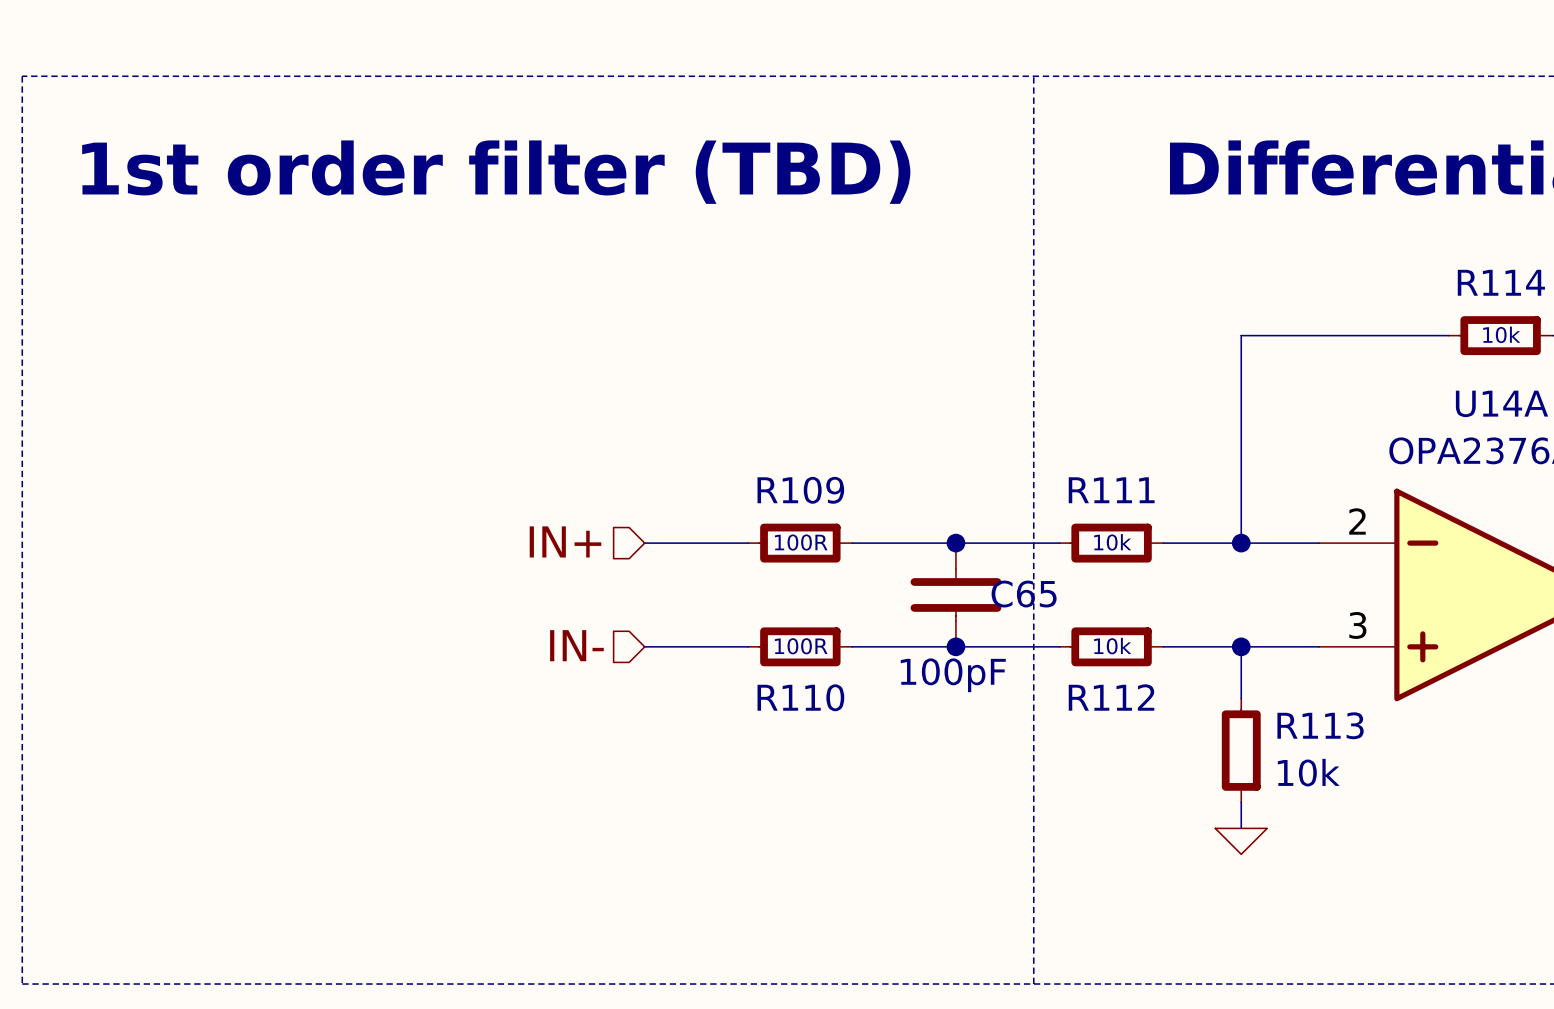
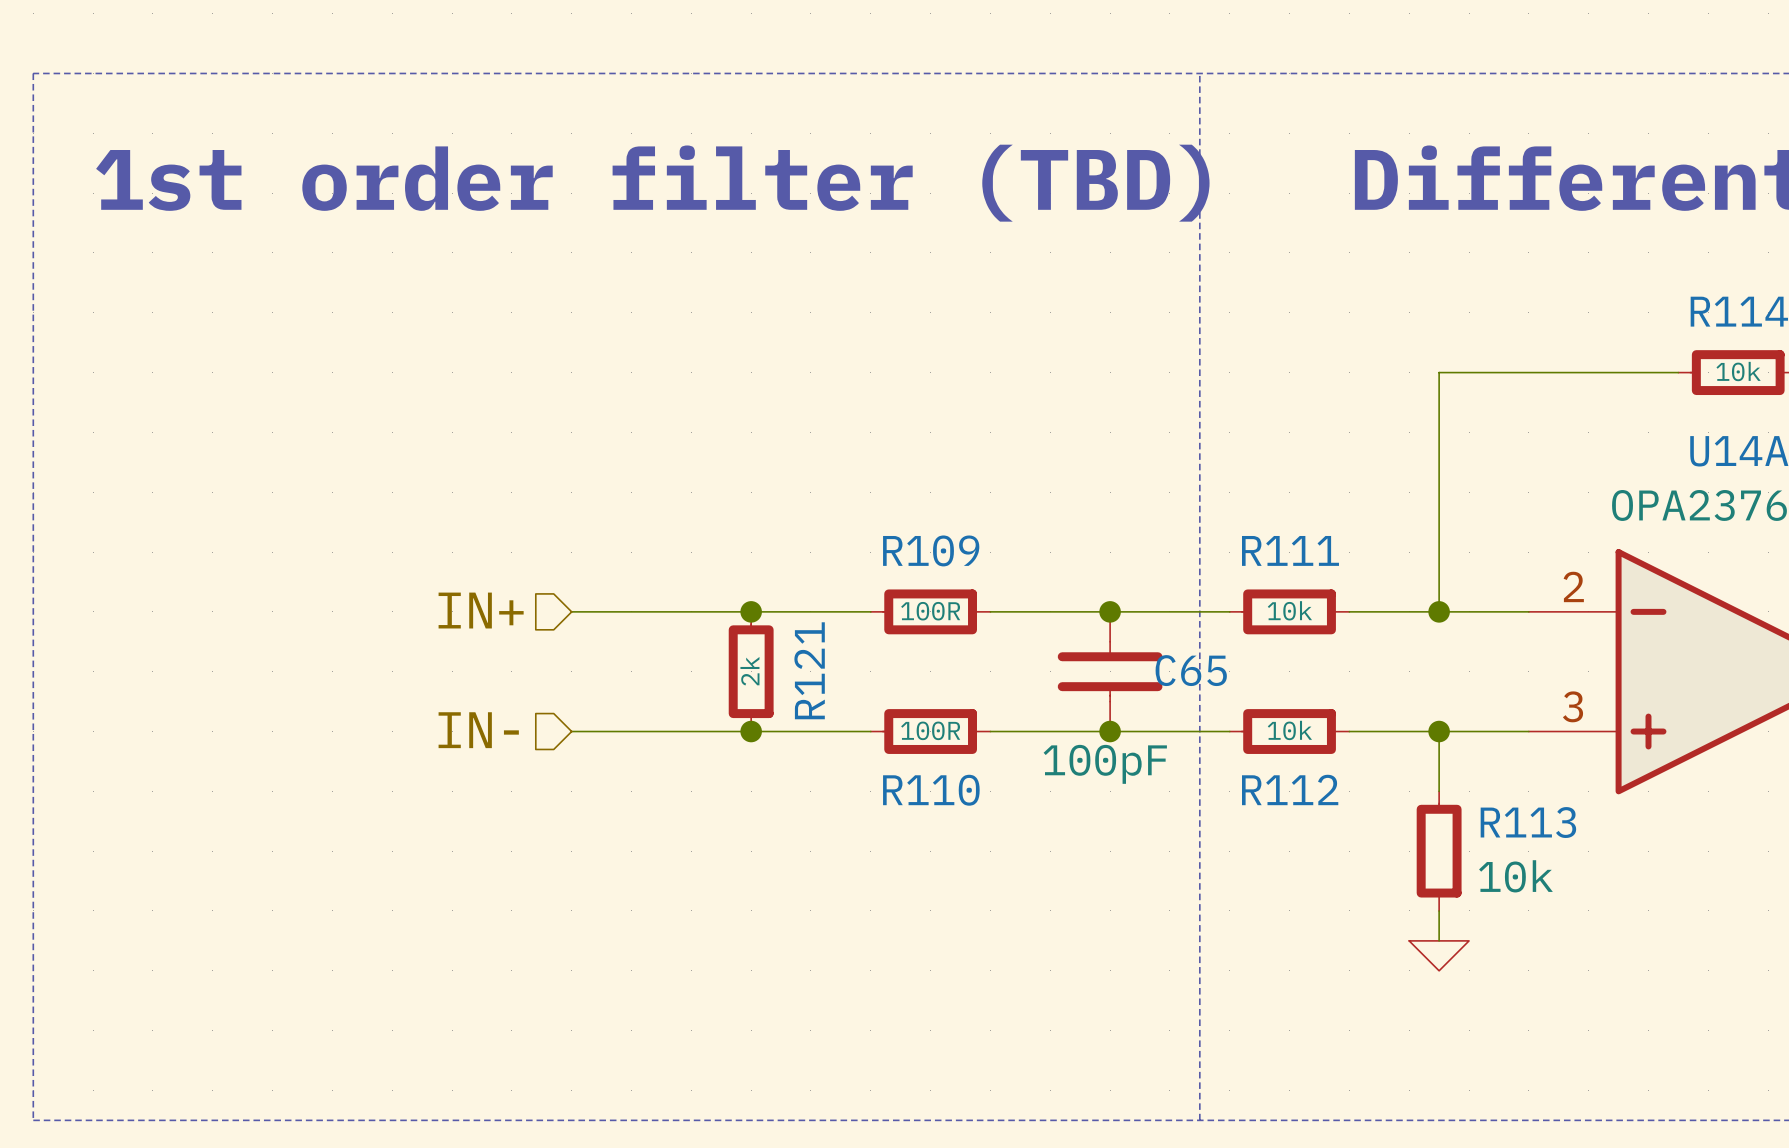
hierarchical label position: IN+ (565, 541) -> IN+ (481, 610)
wire: none -> (571, 611) (751, 611)
junction: none -> (751, 611)
R121: none -> 2k (751, 671)
hierarchical label position: IN- (576, 645) -> IN- (478, 730)
wire: none -> (571, 731) (751, 731)
junction: none -> (751, 731)

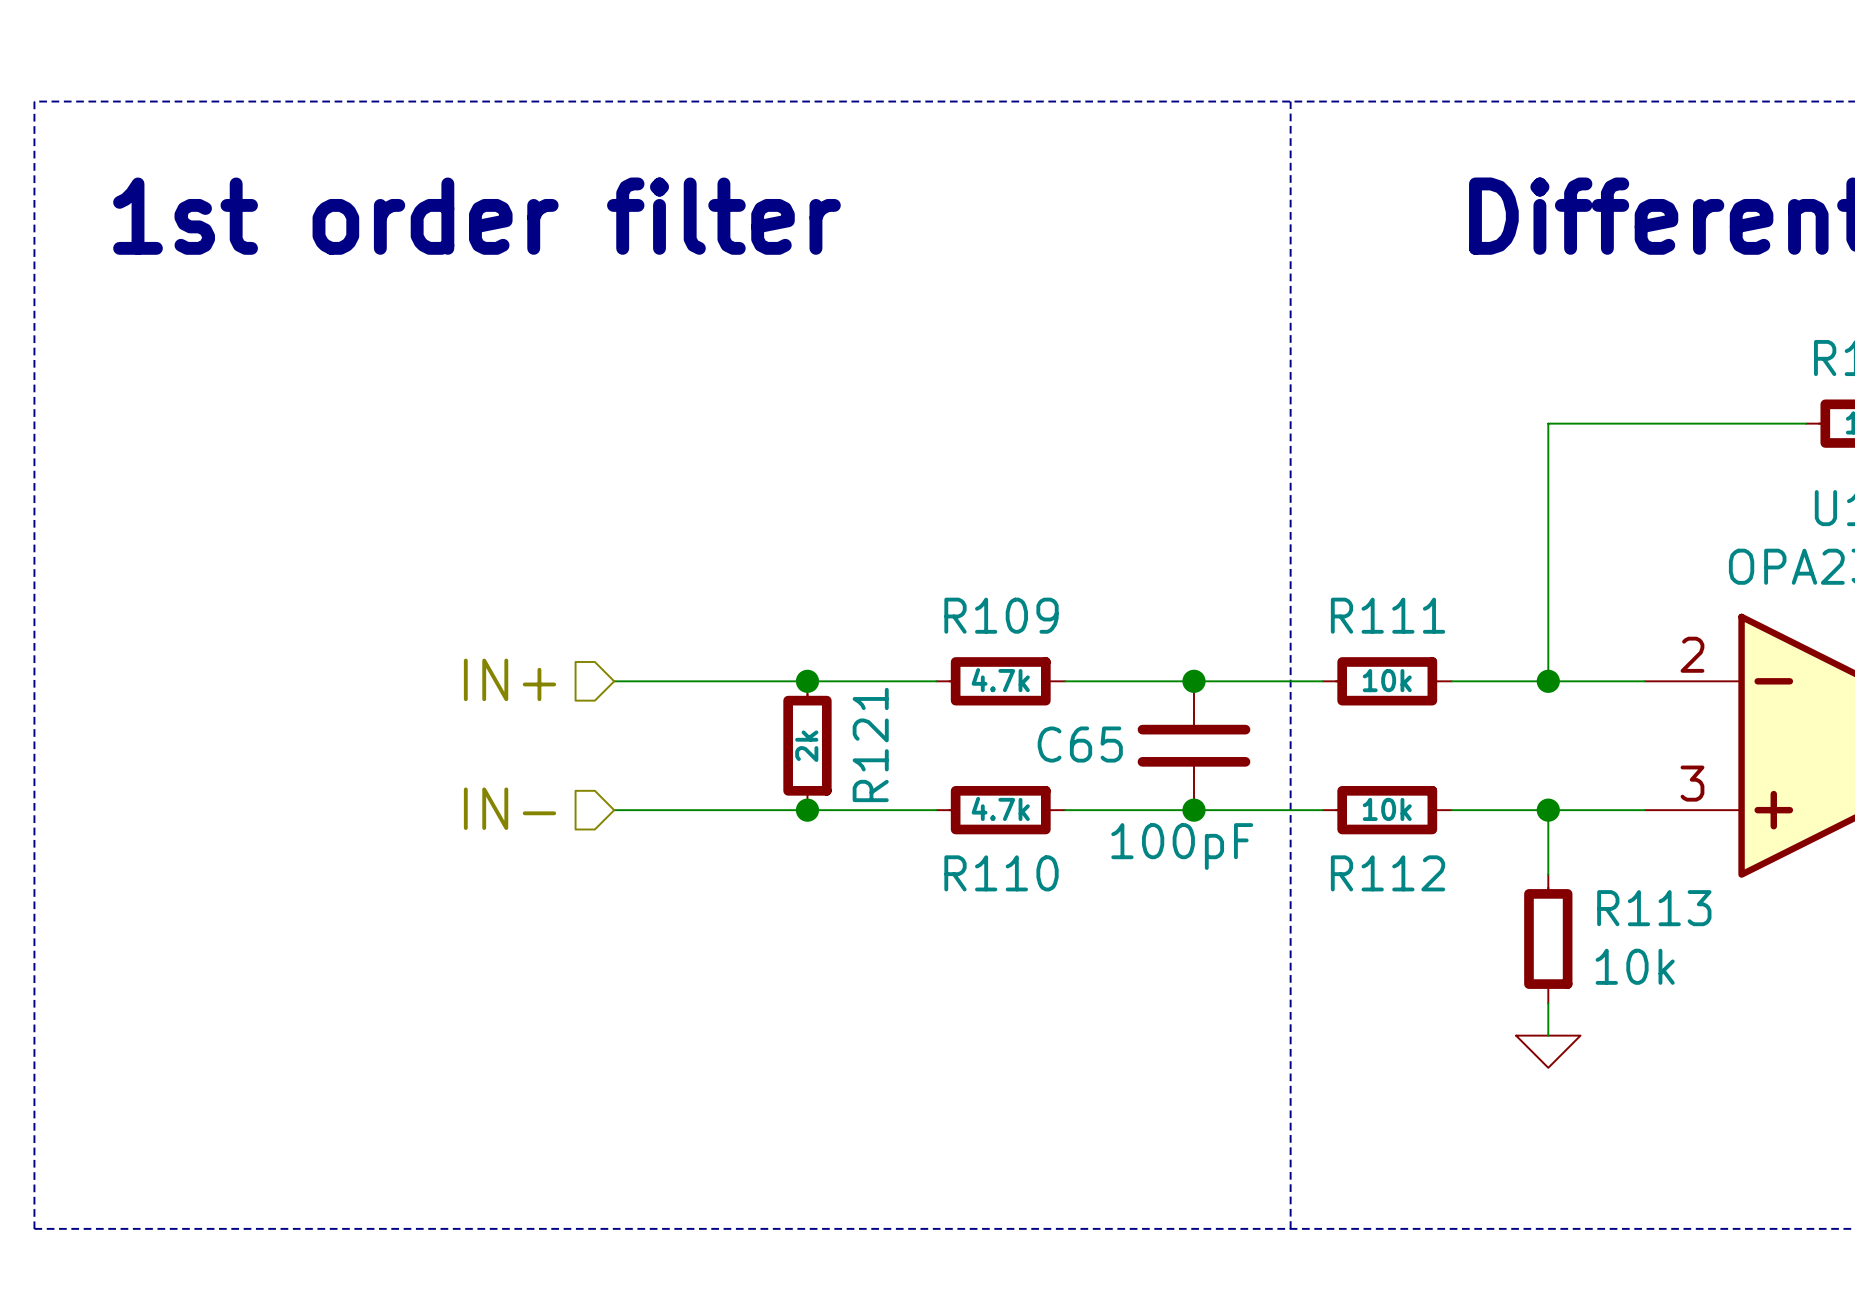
text: 1st order filter (TBD) (652, 183) -> 1st order filter (476, 216)
R109 value: 100R (930, 611) -> 4.7k (1000, 680)
C65 name position: C65 (1191, 670) -> C65 (1080, 744)
R110 value: 100R (930, 730) -> 4.7k (1000, 808)

